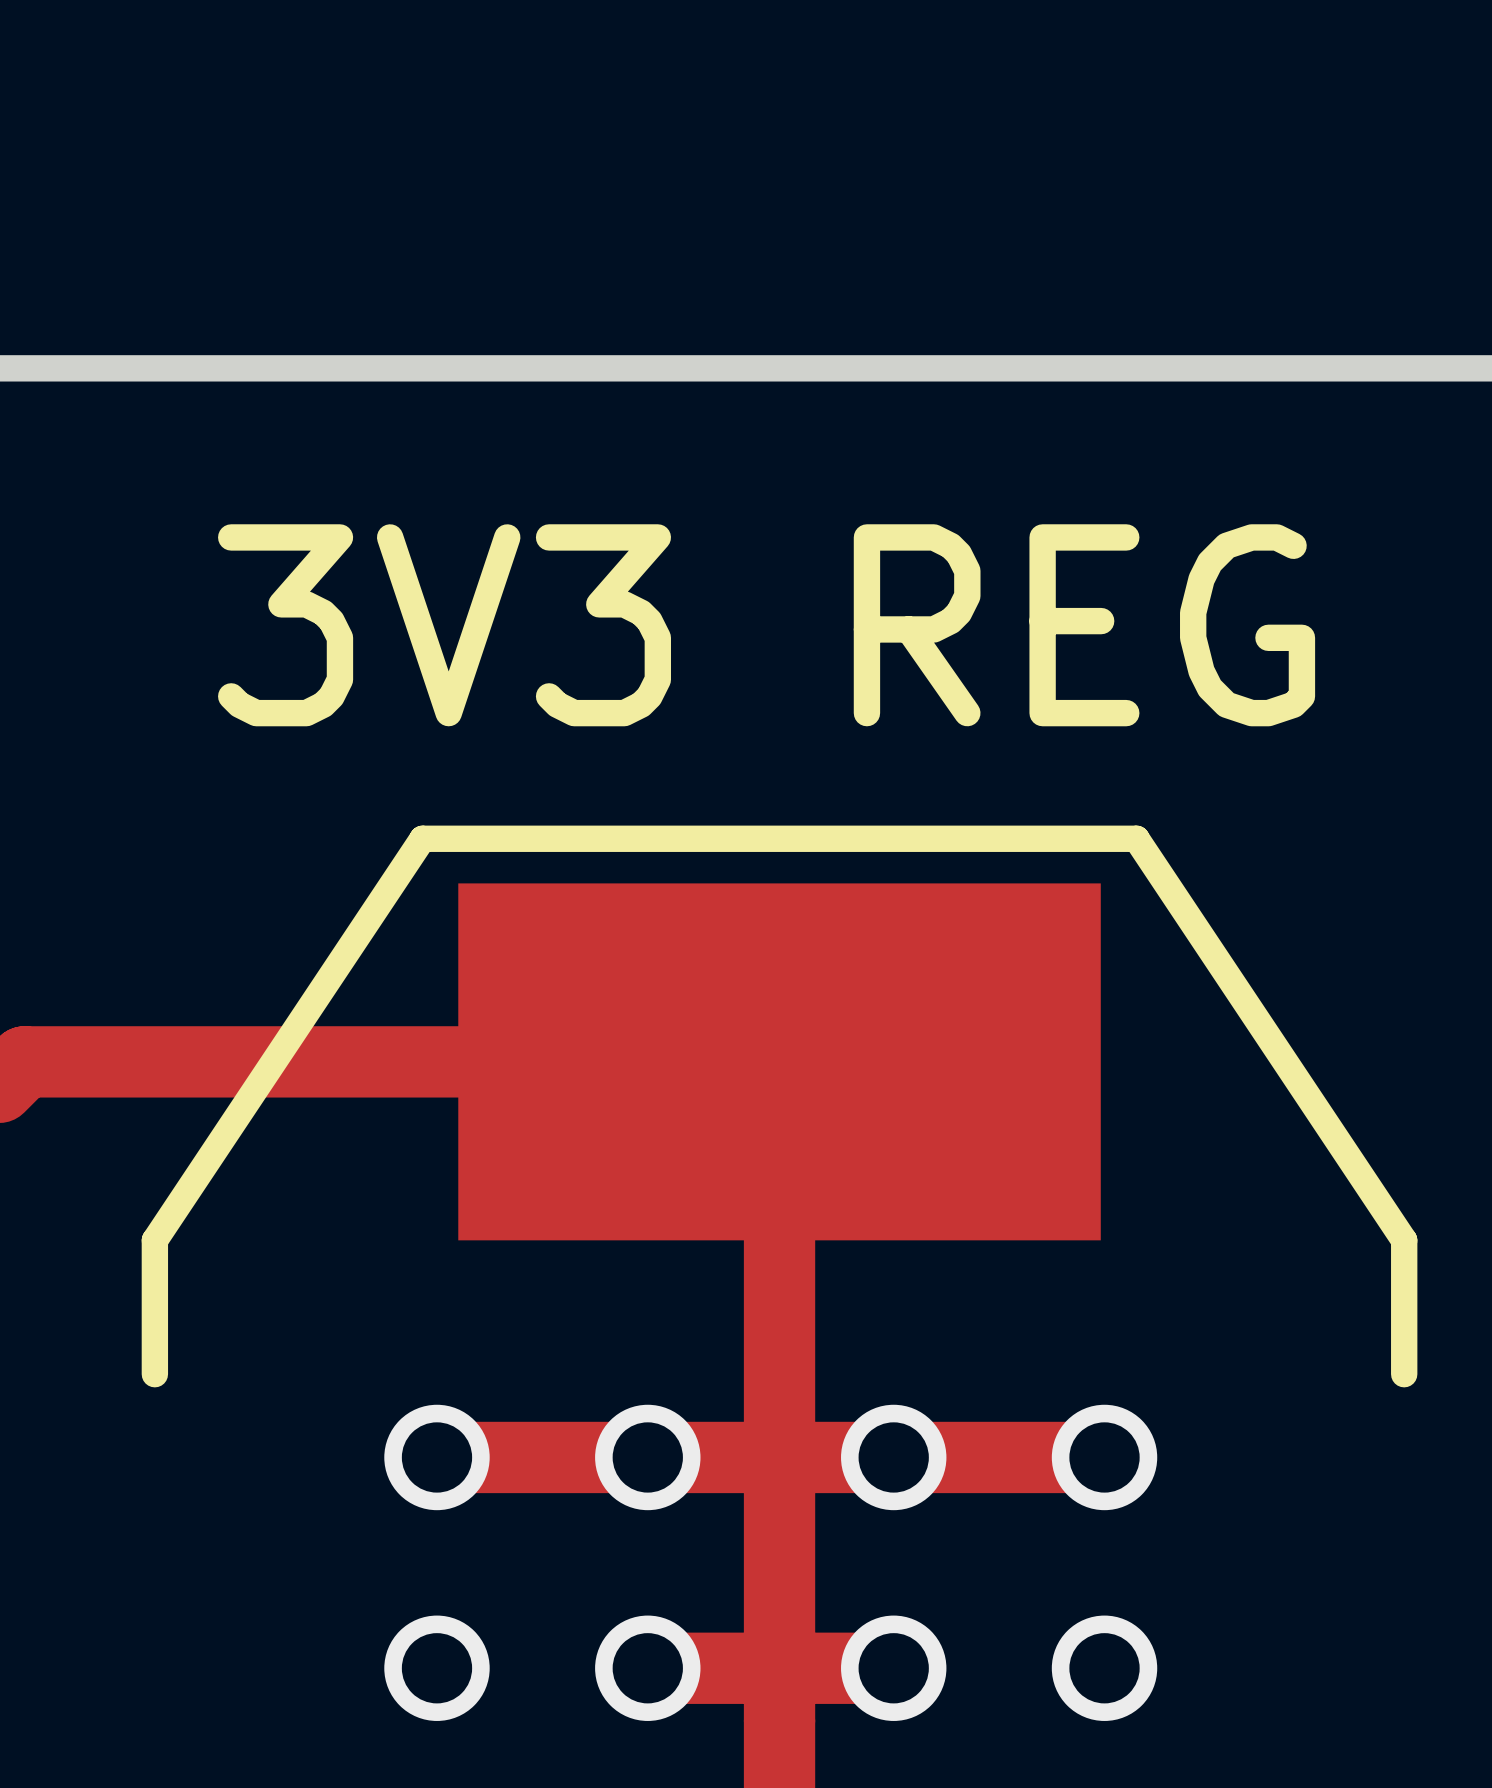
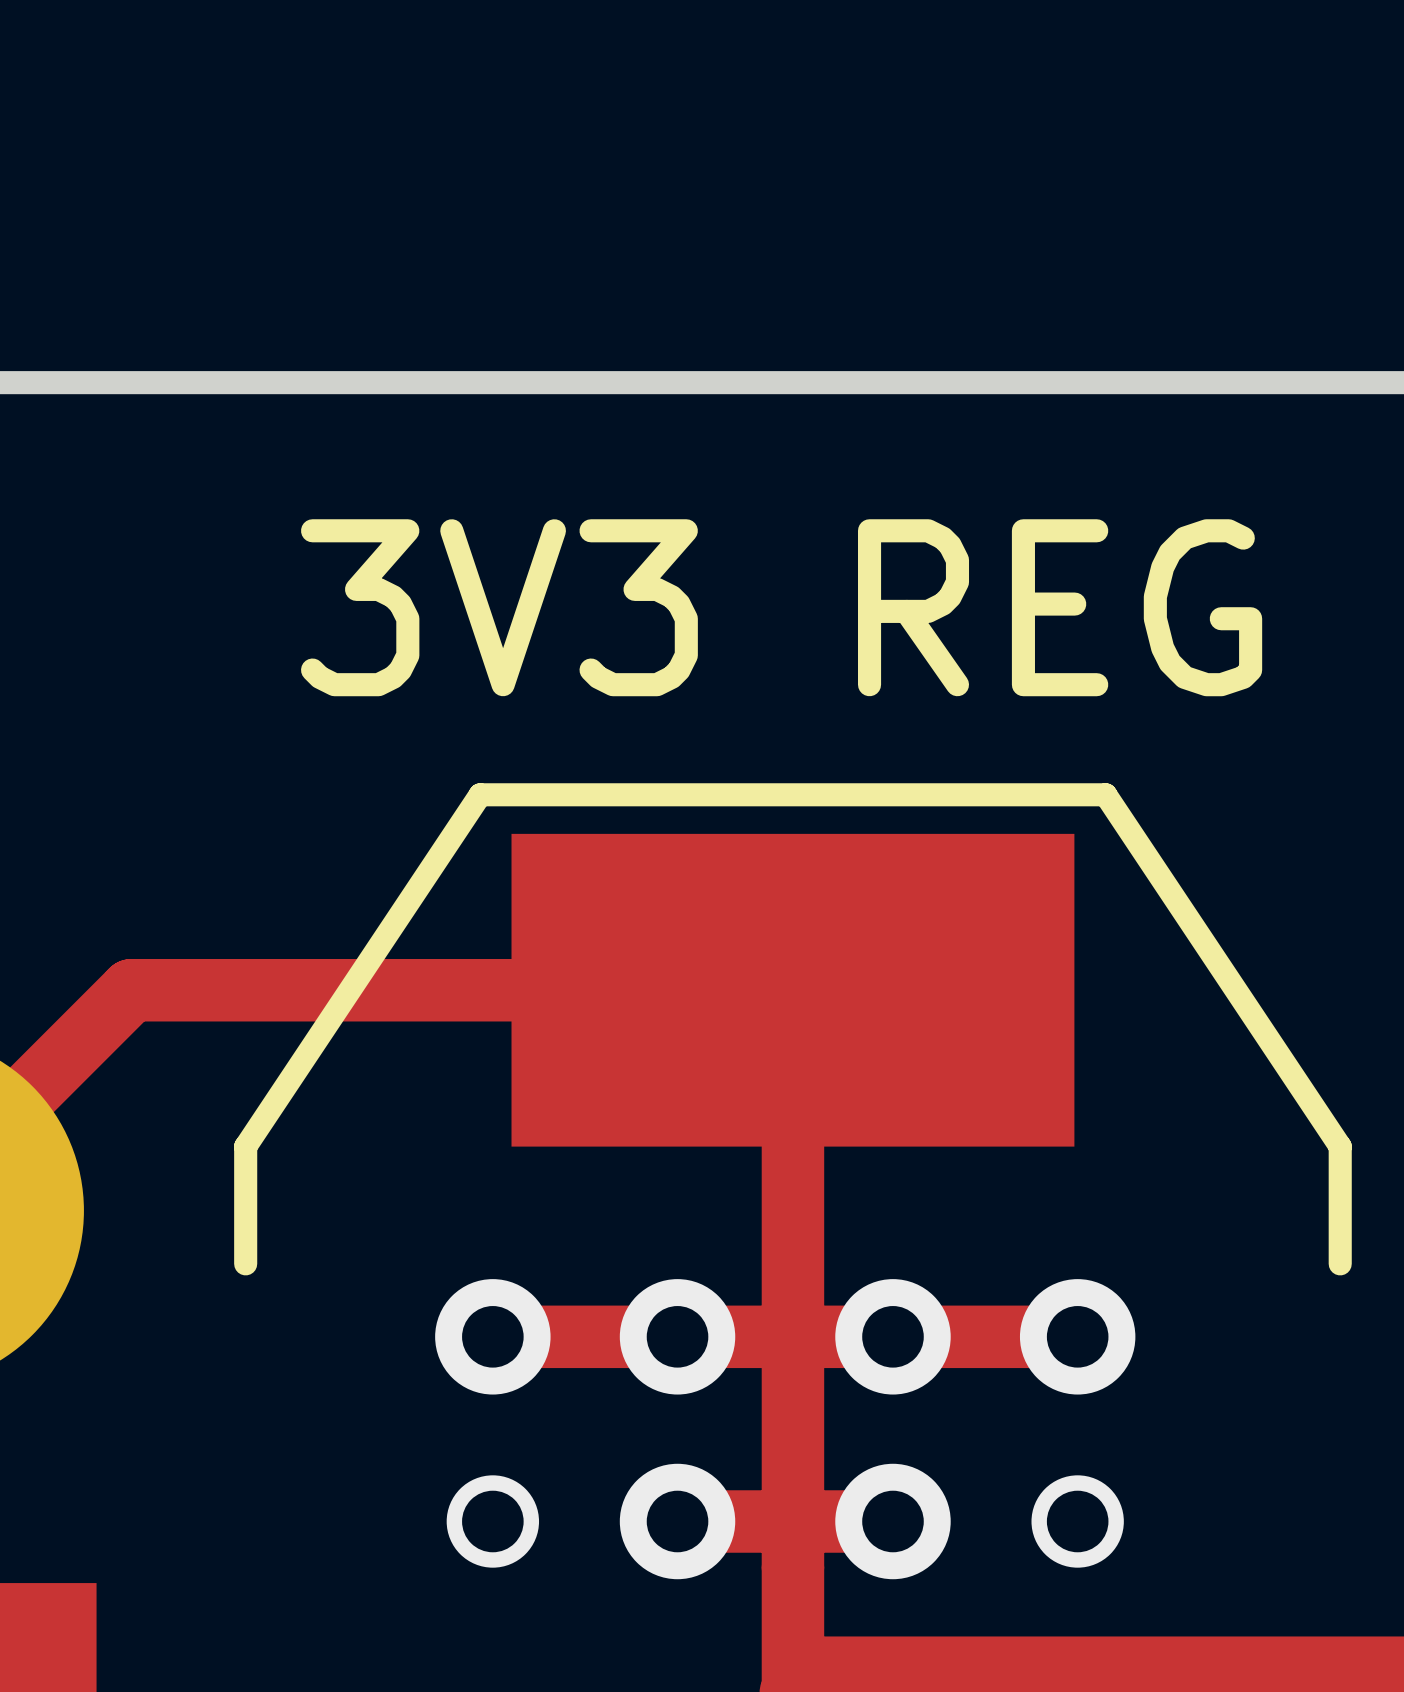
via size: [384, 1404, 490, 1511] -> [435, 1279, 551, 1395]
via size: [595, 1404, 701, 1511] -> [619, 1279, 736, 1395]
via size: [841, 1404, 947, 1511] -> [835, 1279, 951, 1395]
via size: [1051, 1404, 1158, 1511] -> [1019, 1279, 1136, 1395]
via size: [595, 1615, 701, 1721] -> [619, 1463, 736, 1580]
via size: [841, 1615, 947, 1721] -> [835, 1463, 951, 1580]

